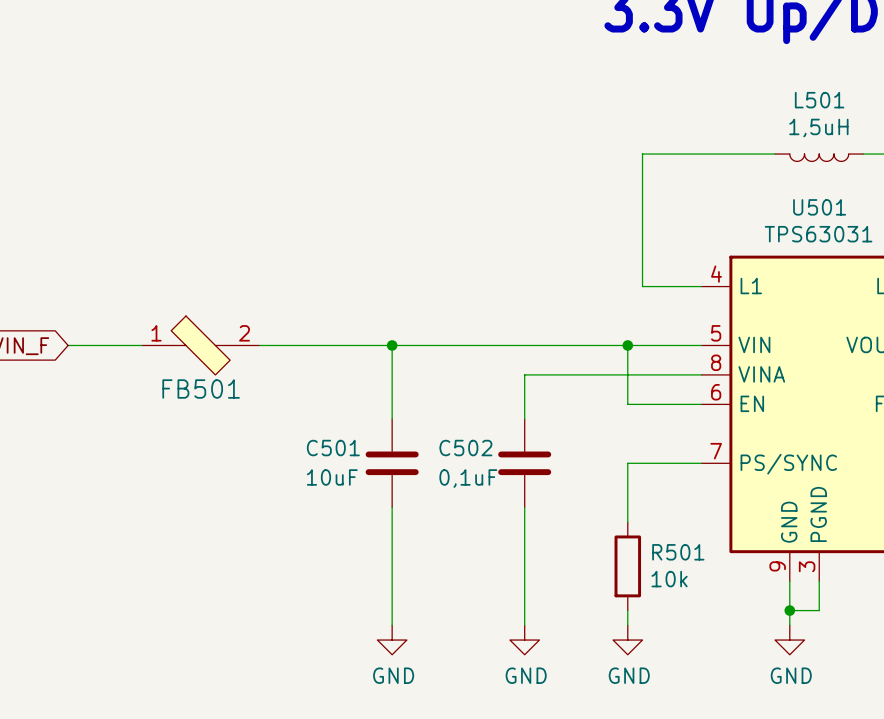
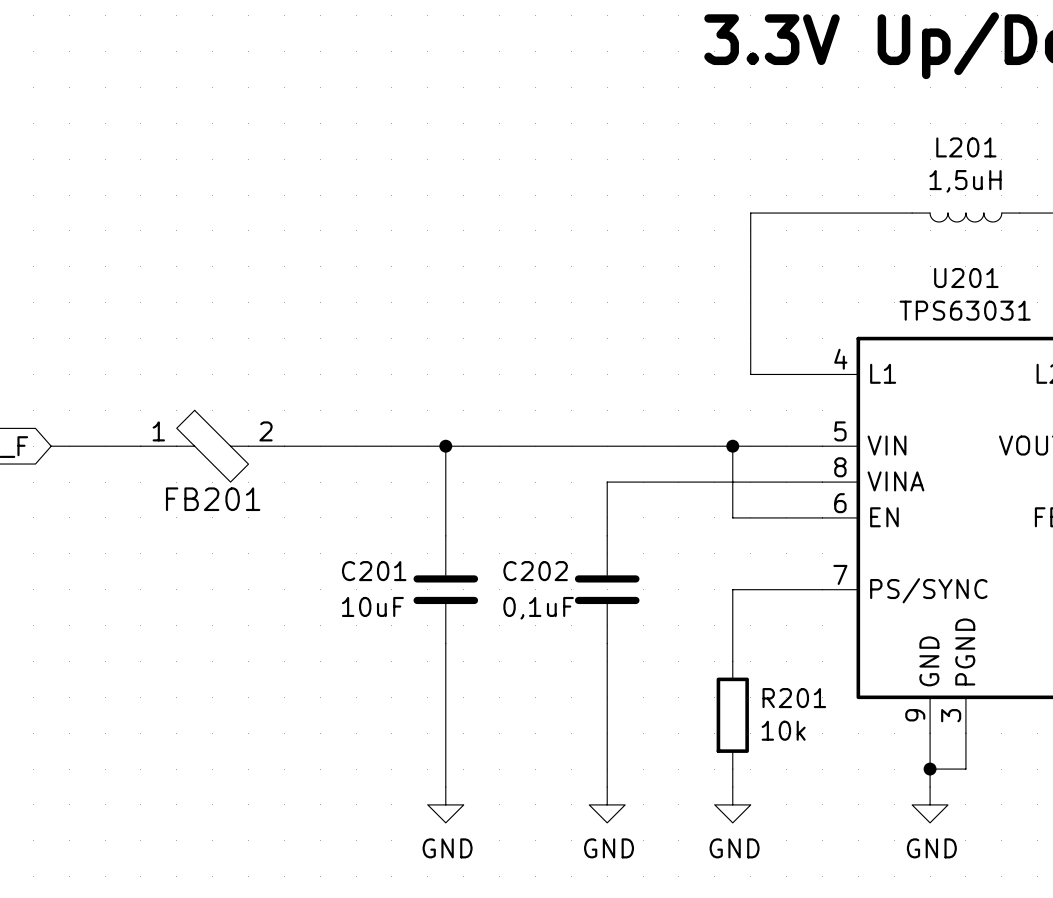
L501 name: L501 (819, 100) -> L201 (966, 147)
U501 name: U501 (819, 207) -> U201 (966, 278)
FB501 name: FB501 (201, 389) -> FB201 (213, 499)
C501 name: C501 (333, 448) -> C201 (374, 571)
C502 name: C502 (465, 448) -> C202 (535, 571)
R501 name: R501 (678, 552) -> R201 (794, 698)

